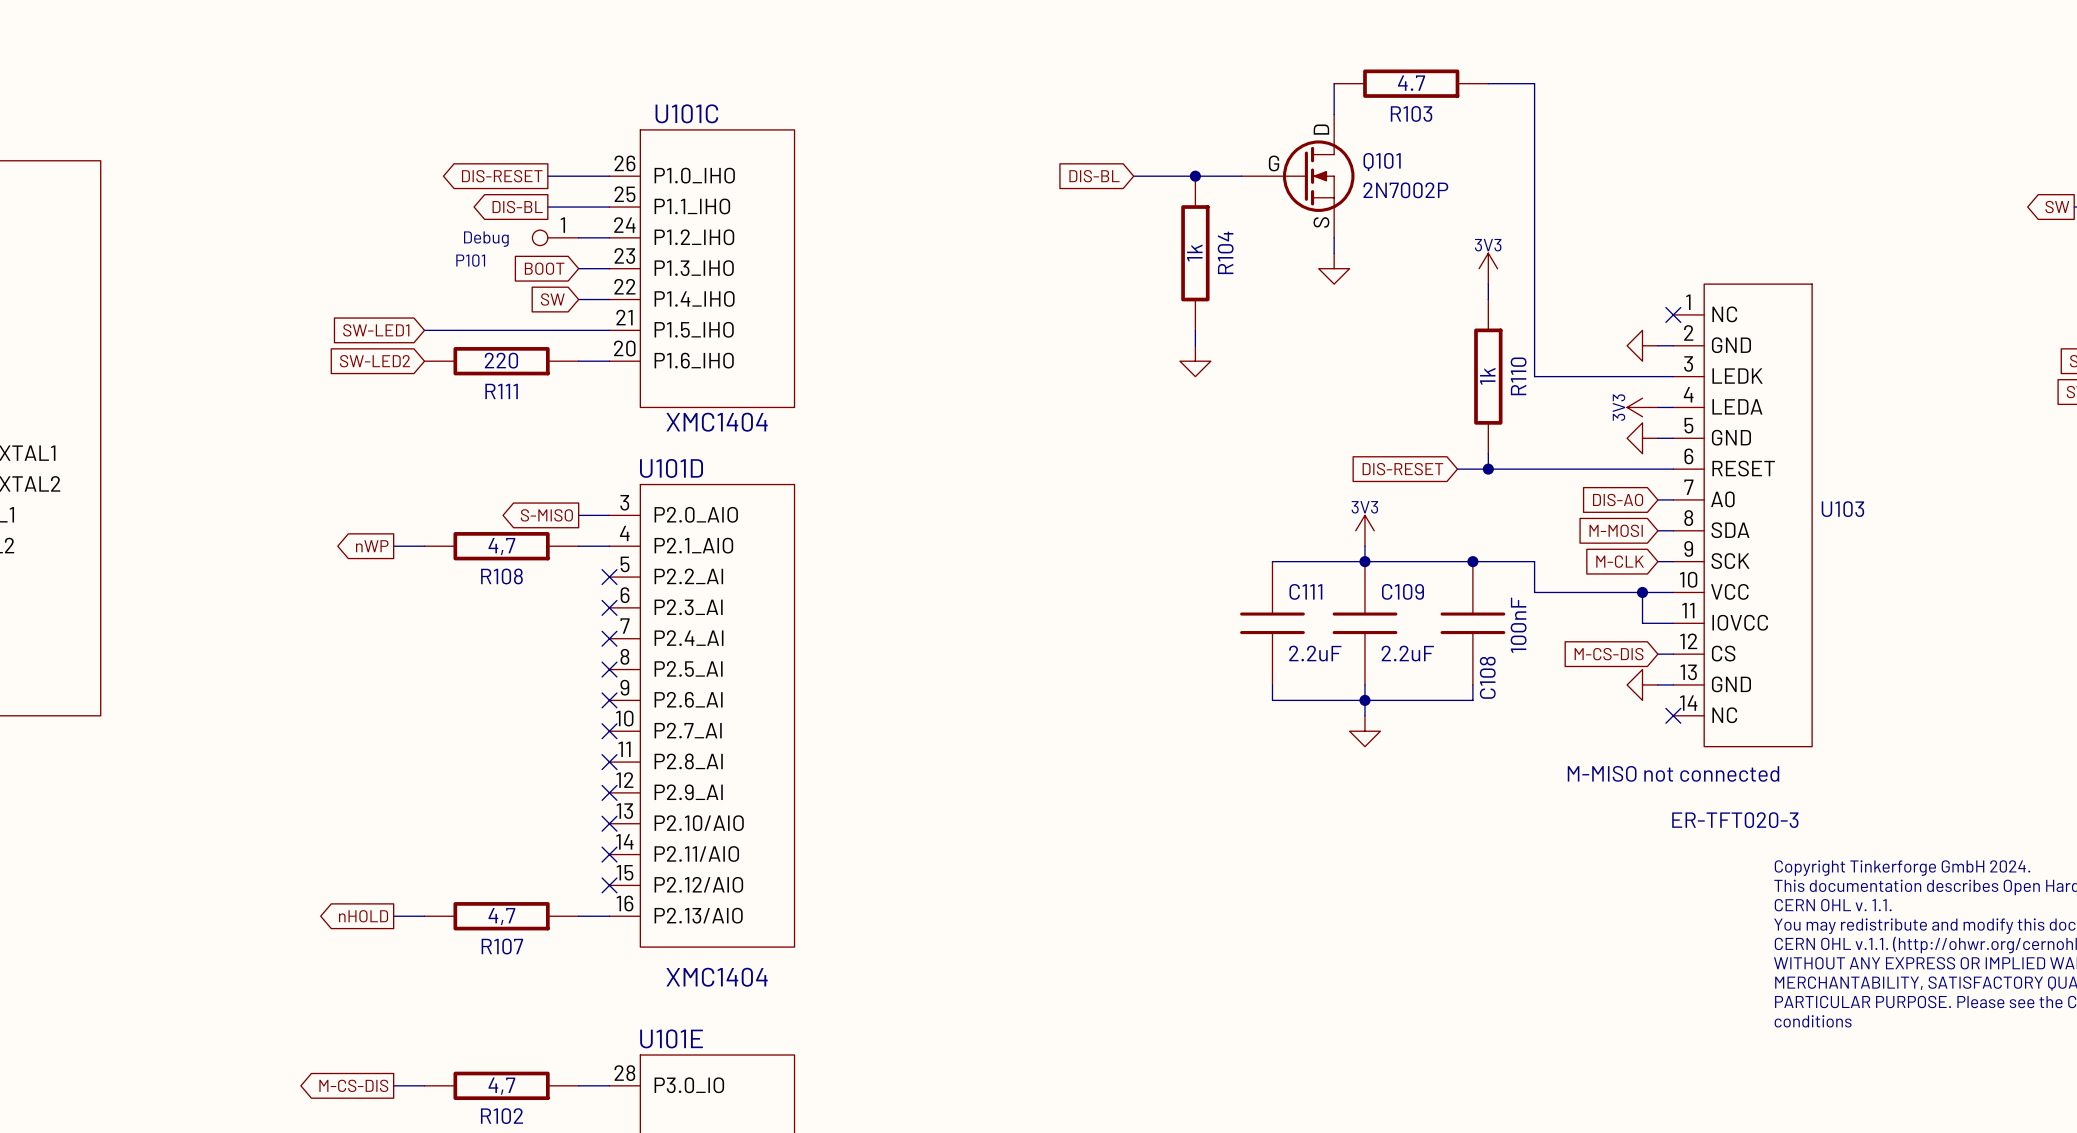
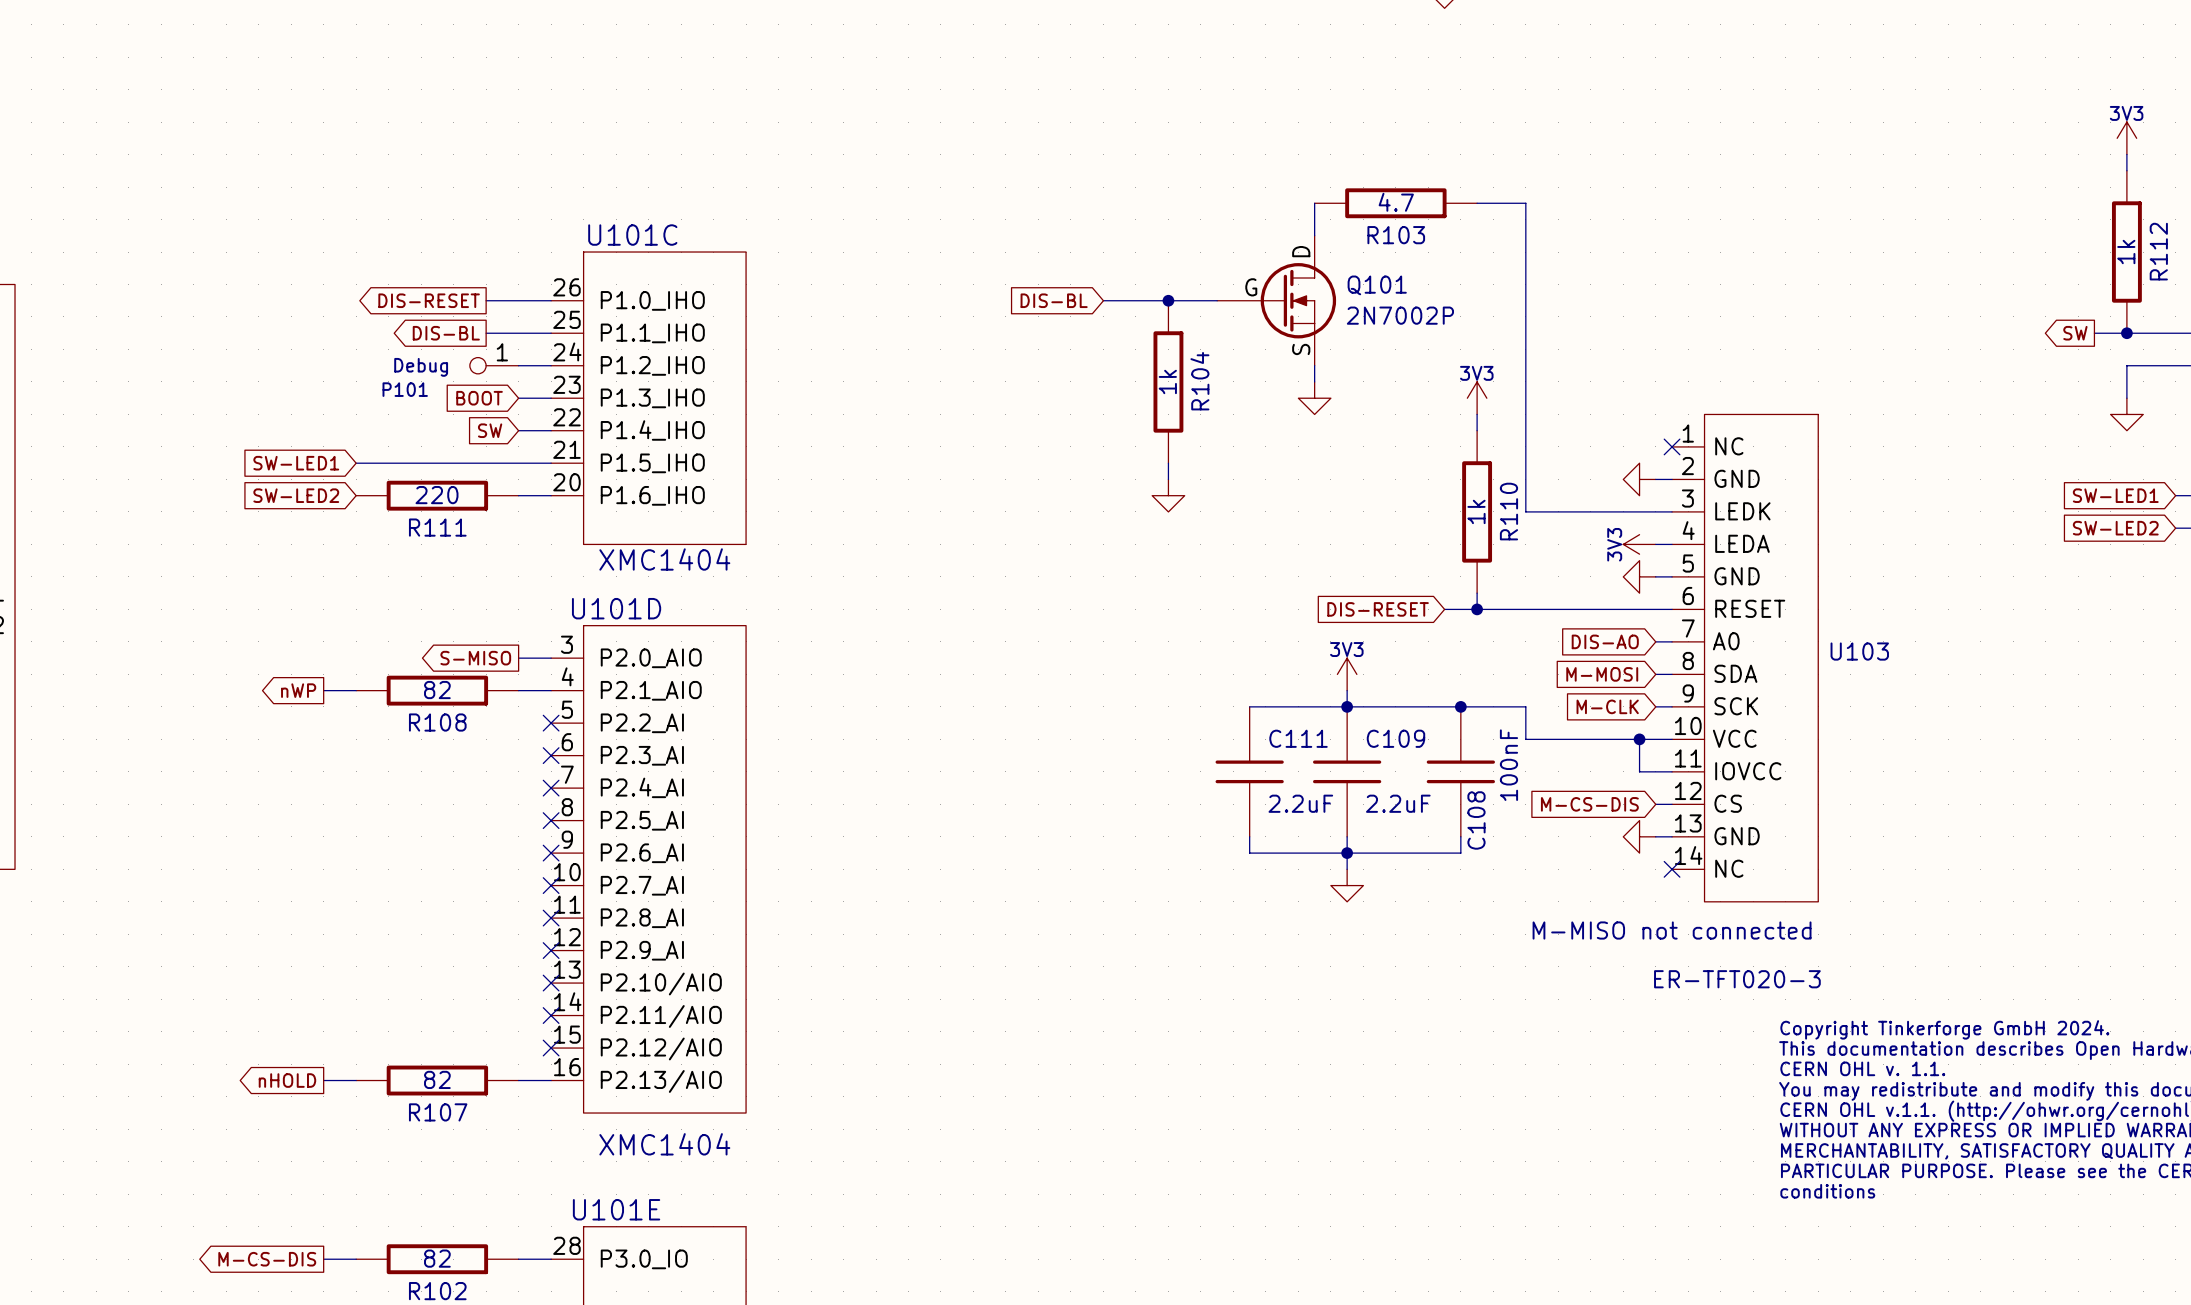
R108 value: 4,7 (501, 546) -> 82 (437, 690)
R107 value: 4,7 (501, 916) -> 82 (437, 1079)
R102 value: 4,7 (501, 1086) -> 82 (437, 1258)

